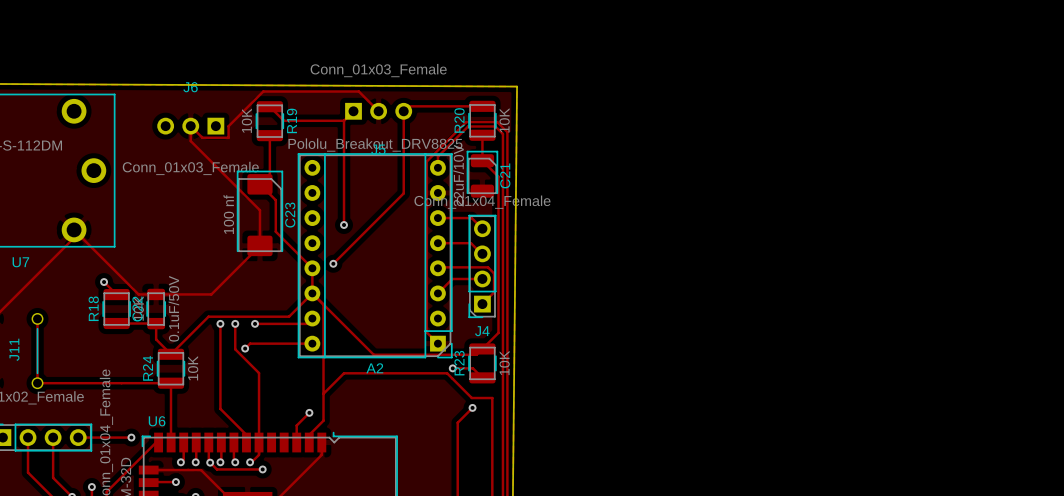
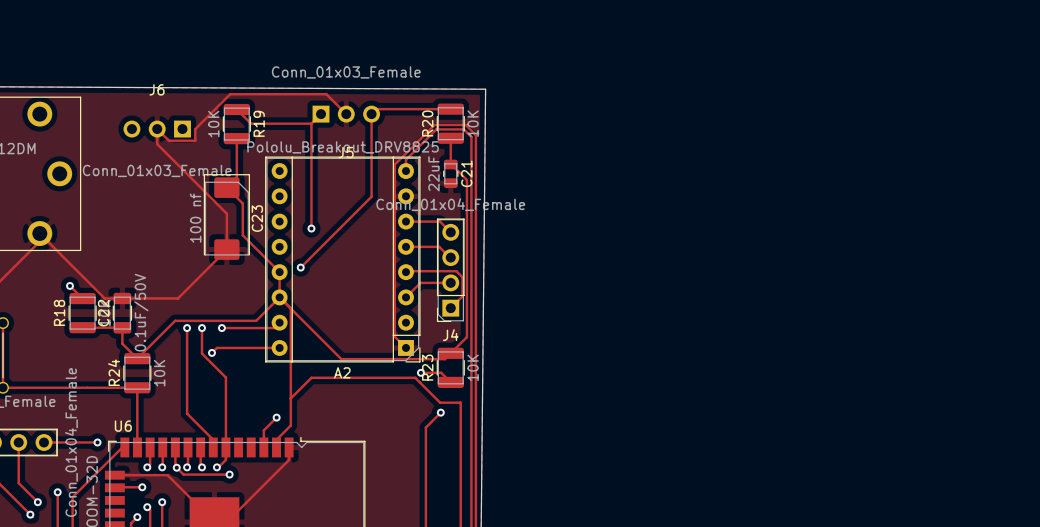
C21 footprint: [466, 151, 498, 198] -> [443, 159, 459, 189]
C21 value: 22uF/10V (458, 175) -> 22uF (433, 173)

